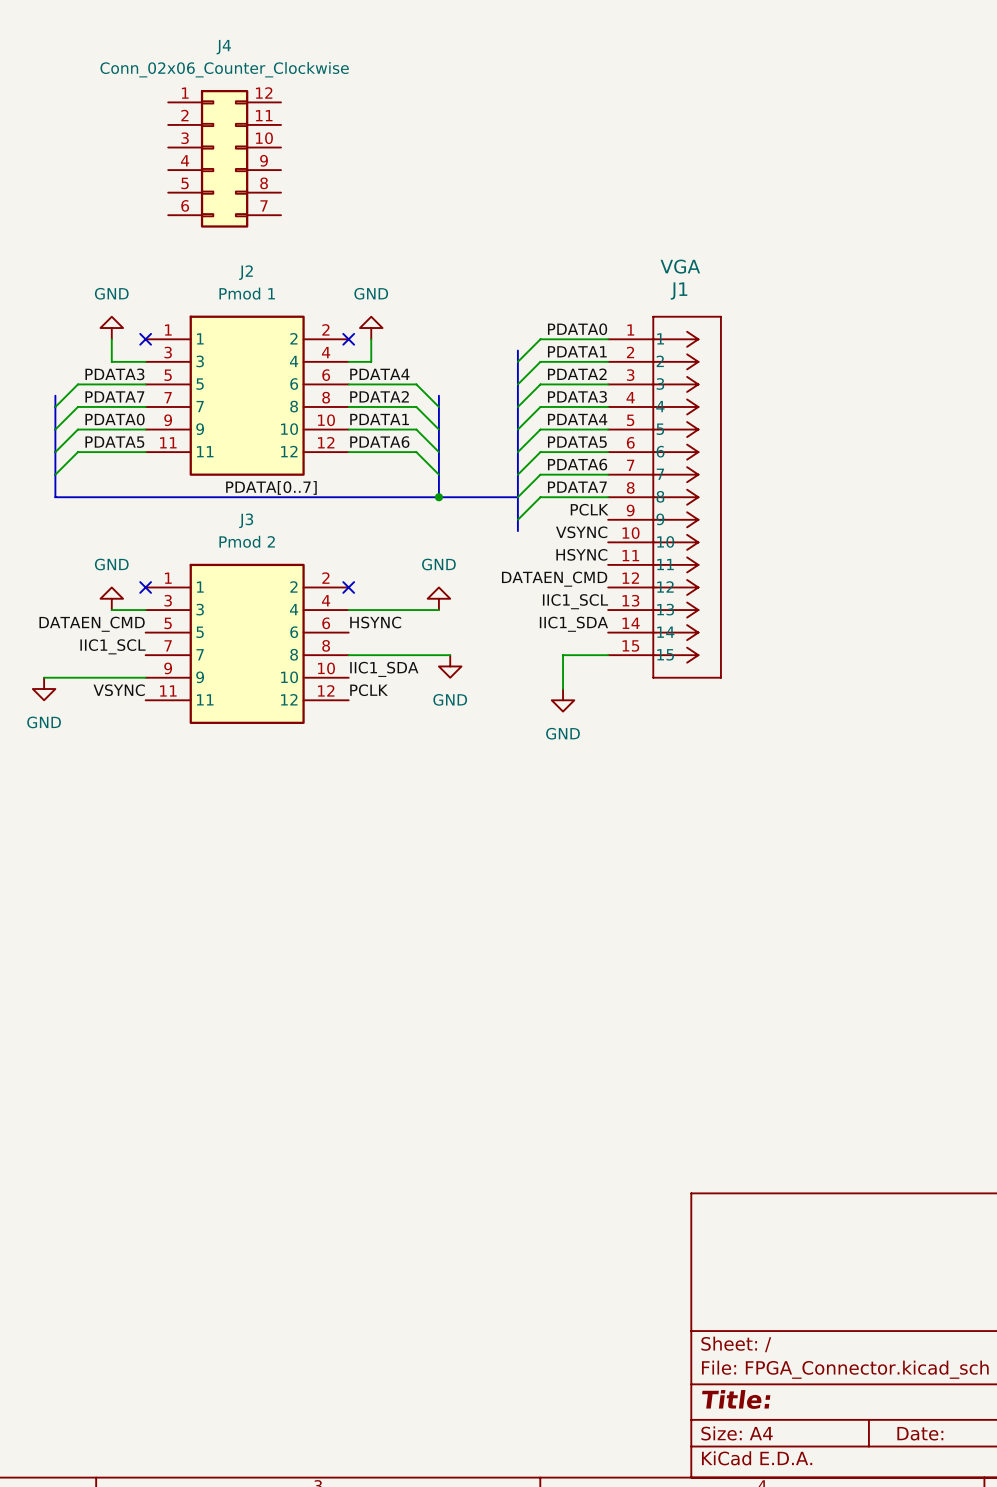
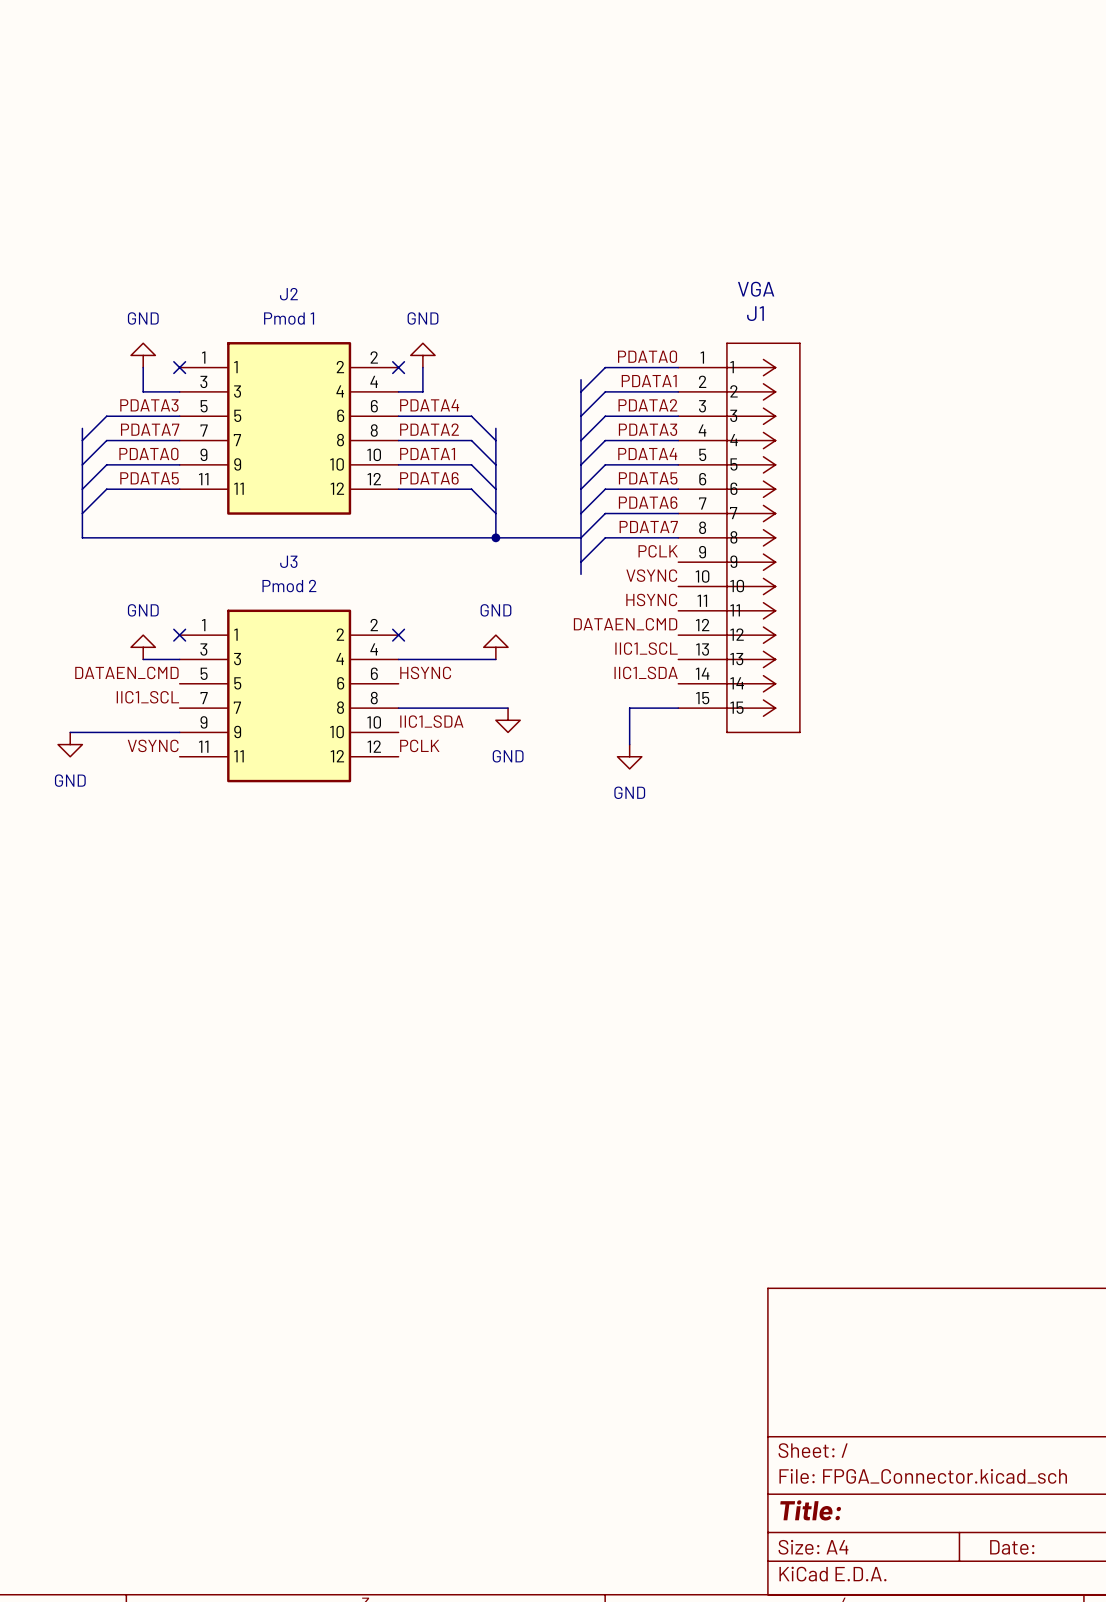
J4: Conn_02x06_Counter_Clockwise (224, 158) -> none
label: PDATA[0..7] (271, 487) -> none

